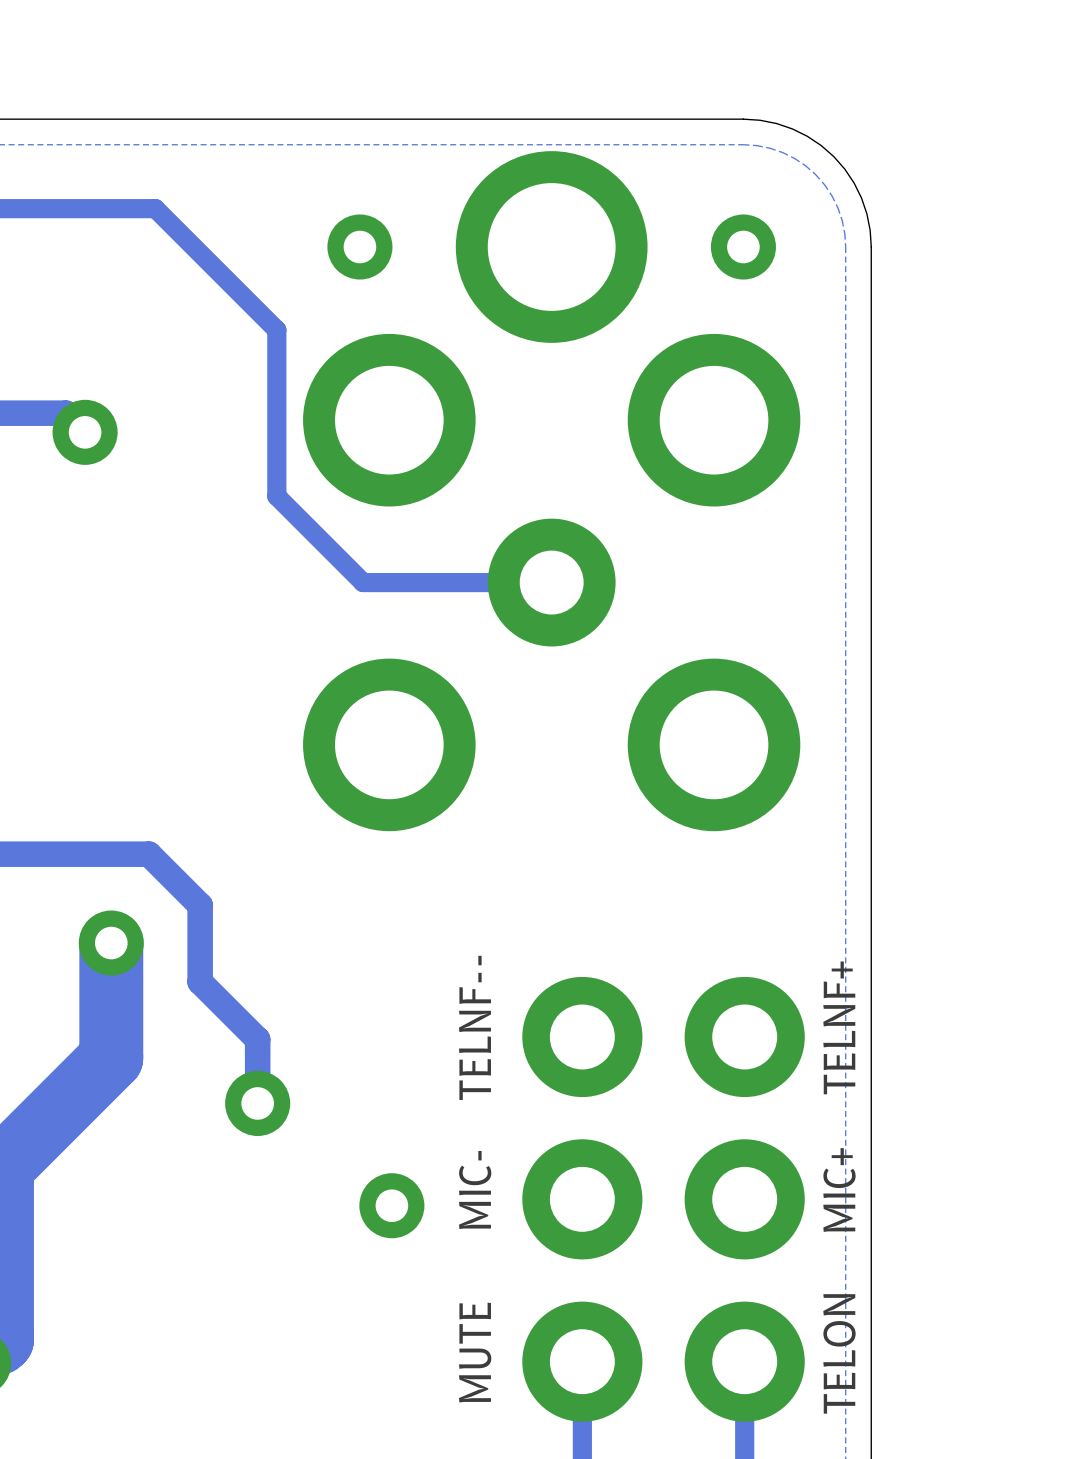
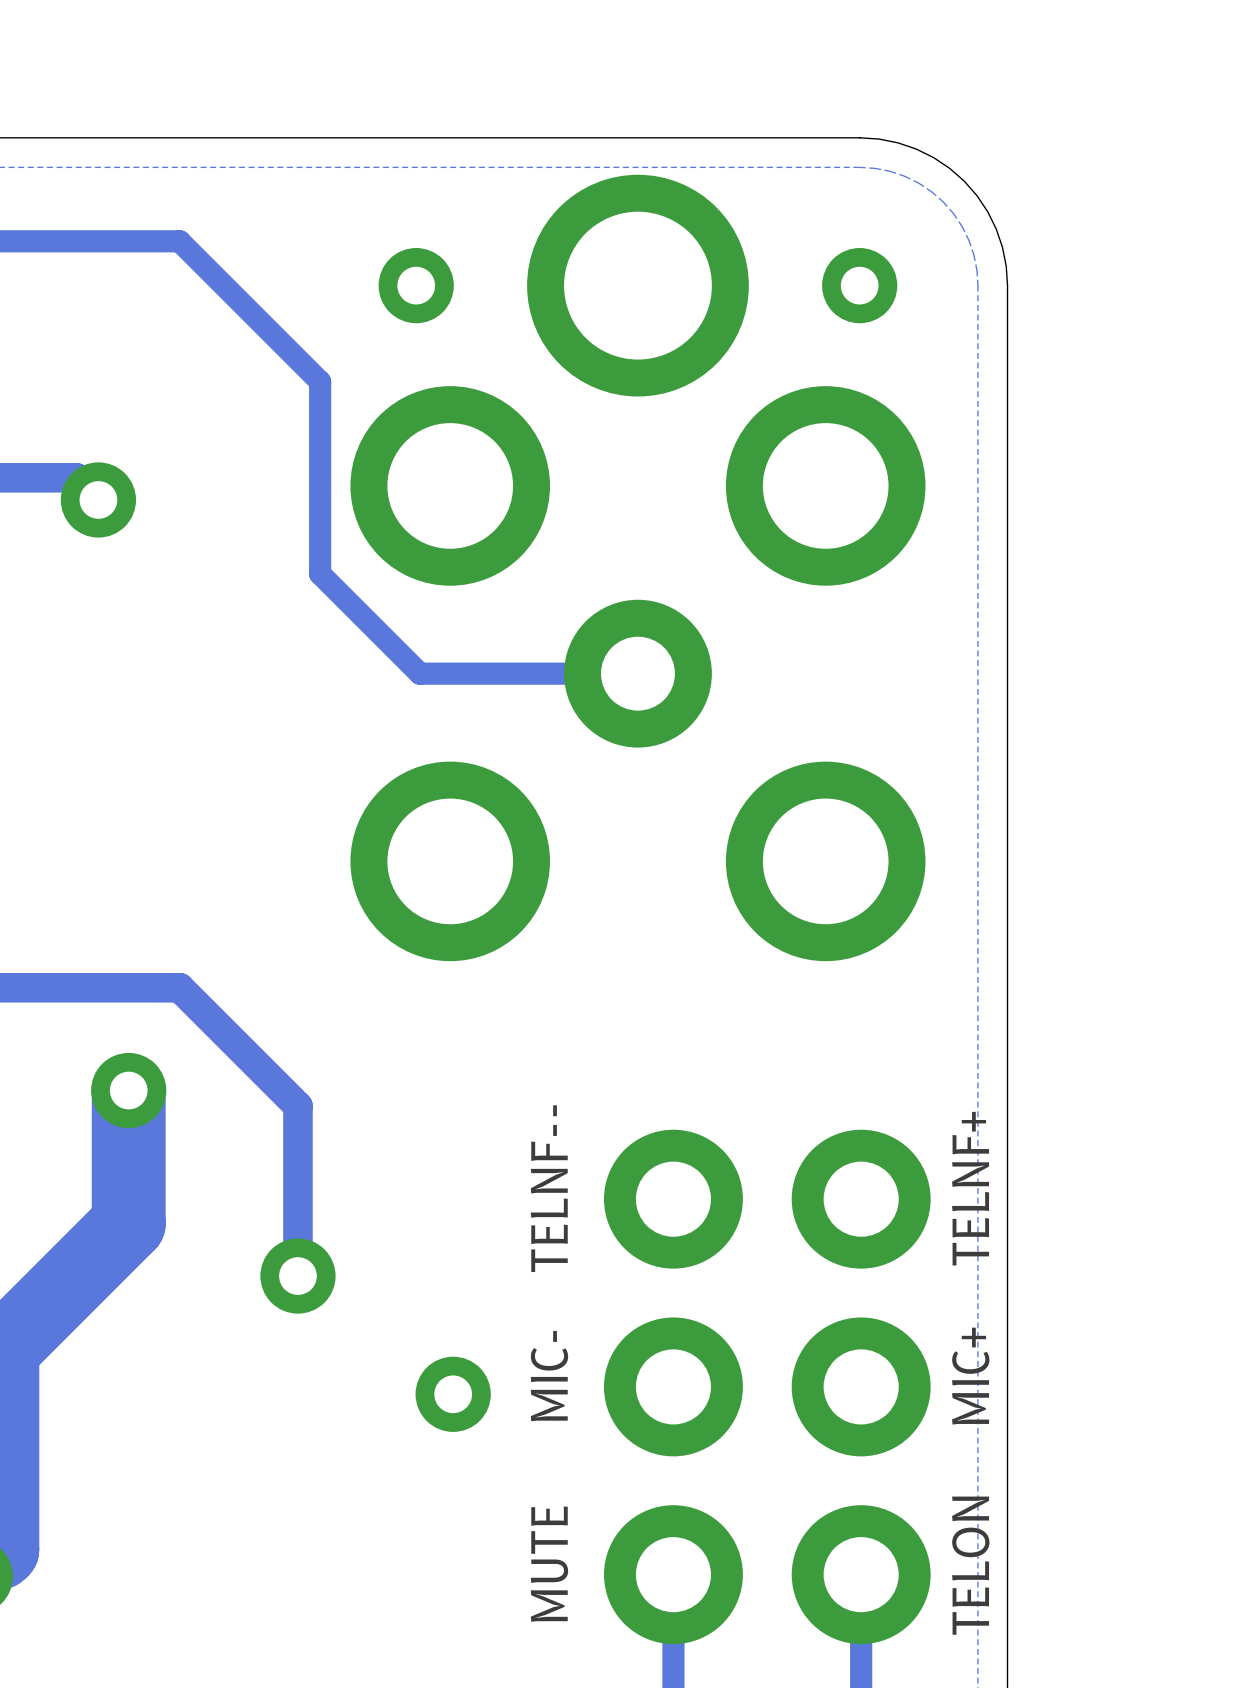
track: (149, 854) (200, 905) (200, 982) (257, 1039) -> (172, 987) (179, 987) (297, 1106) (297, 1202)

